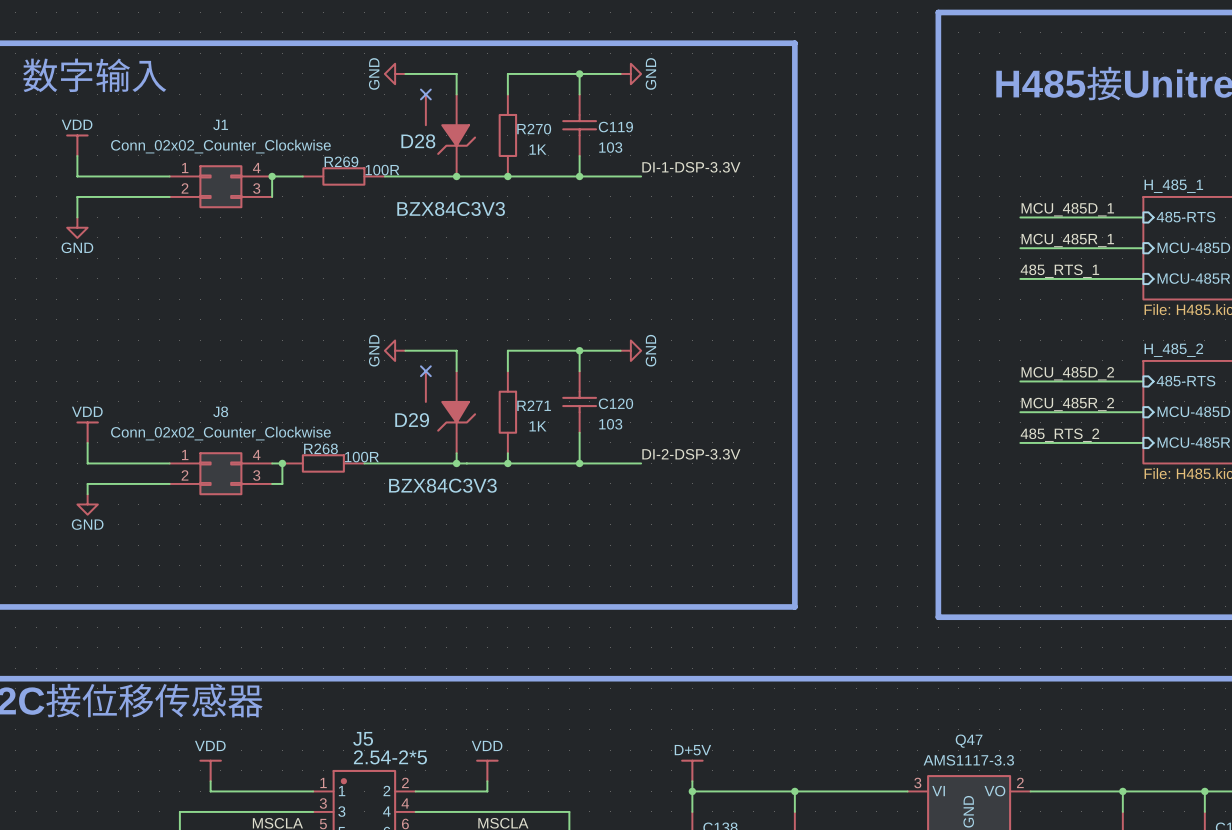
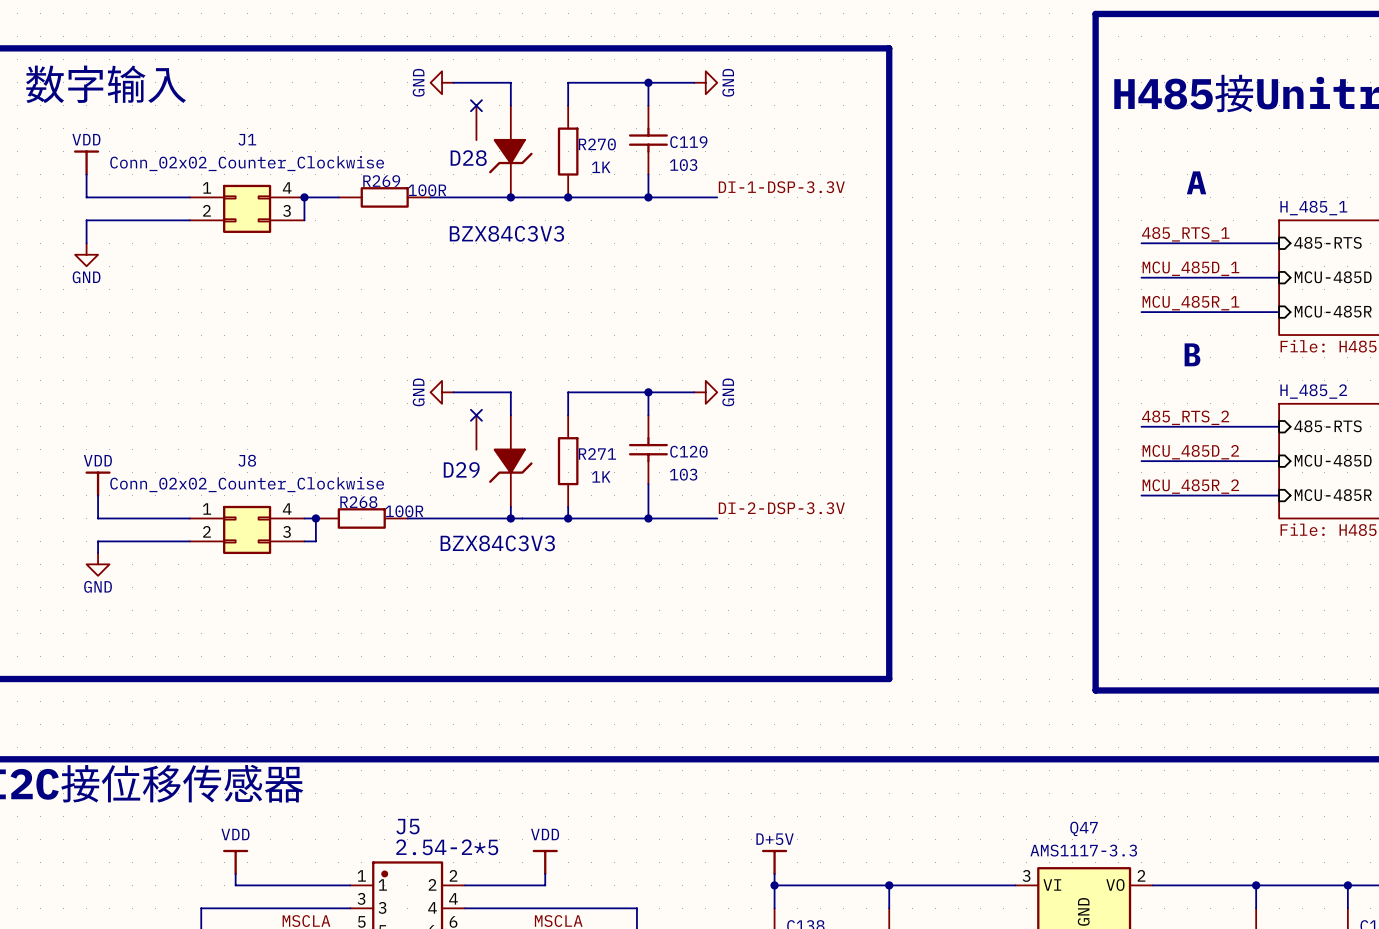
line: (979, 12) (938, 12) (938, 617) (979, 617) -> (1095, 13) (1095, 690)
text: none -> A (1196, 182)
label: MCU_485D_1 (1067, 209) -> 485_RTS_1 (1185, 234)
label: MCU_485R_1 (1067, 240) -> MCU_485D_1 (1190, 268)
label: 485_RTS_1 (1059, 271) -> MCU_485R_1 (1190, 303)
text: none -> B (1192, 354)
label: MCU_485D_2 (1067, 373) -> 485_RTS_2 (1185, 417)
label: MCU_485R_2 (1067, 404) -> MCU_485D_2 (1190, 452)
label: 485_RTS_2 (1059, 435) -> MCU_485R_2 (1190, 486)

